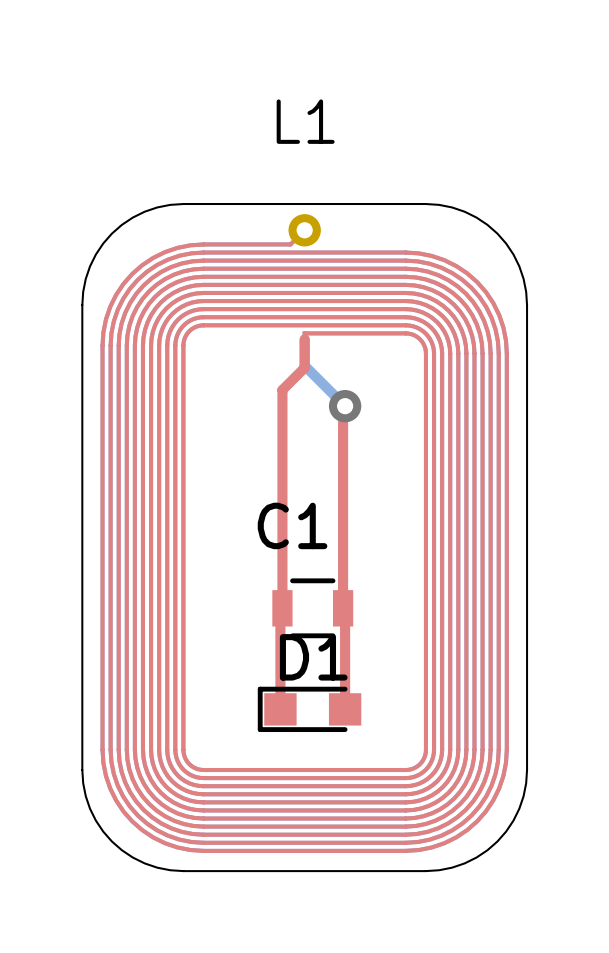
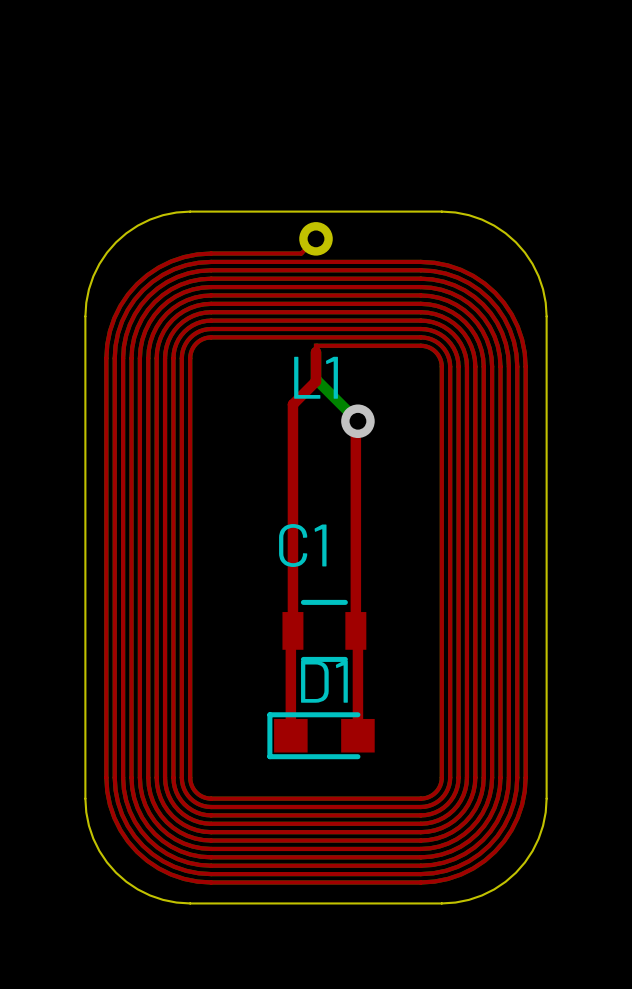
L1 name position: L1 (305, 121) -> L1 (316, 377)

